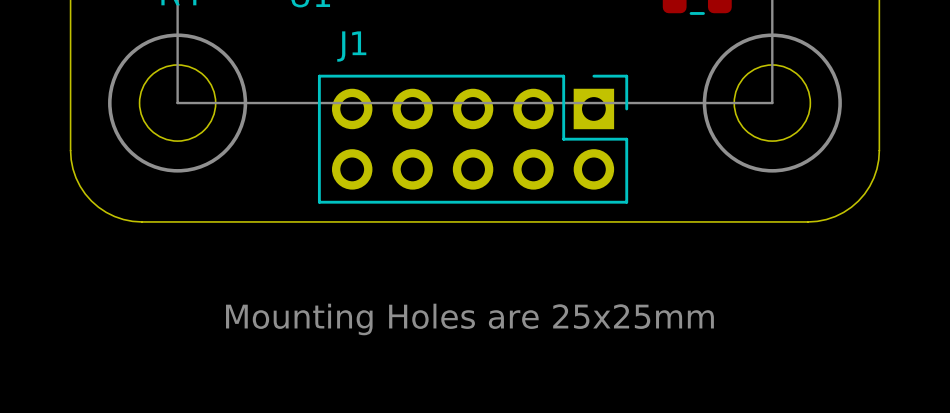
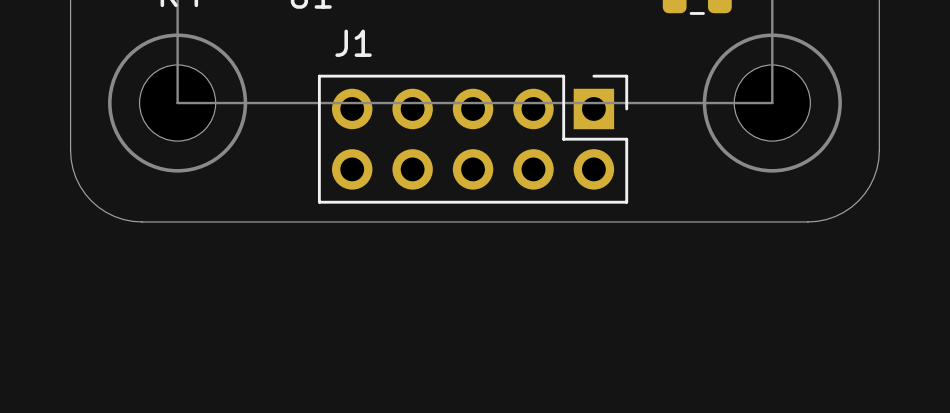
text: Mounting Holes are 25x25mm (469, 319) -> none

